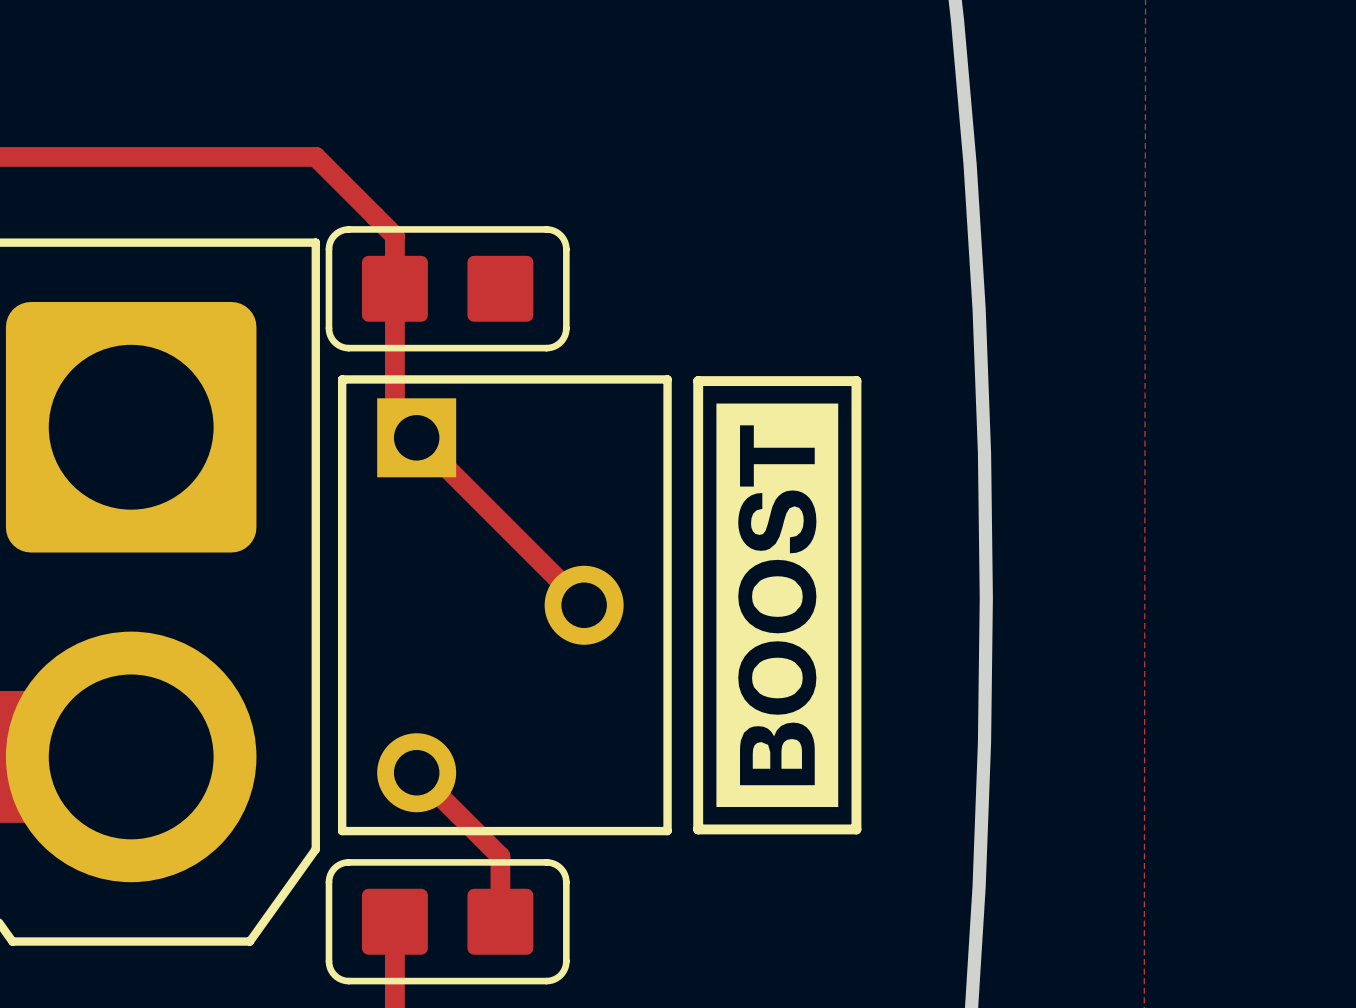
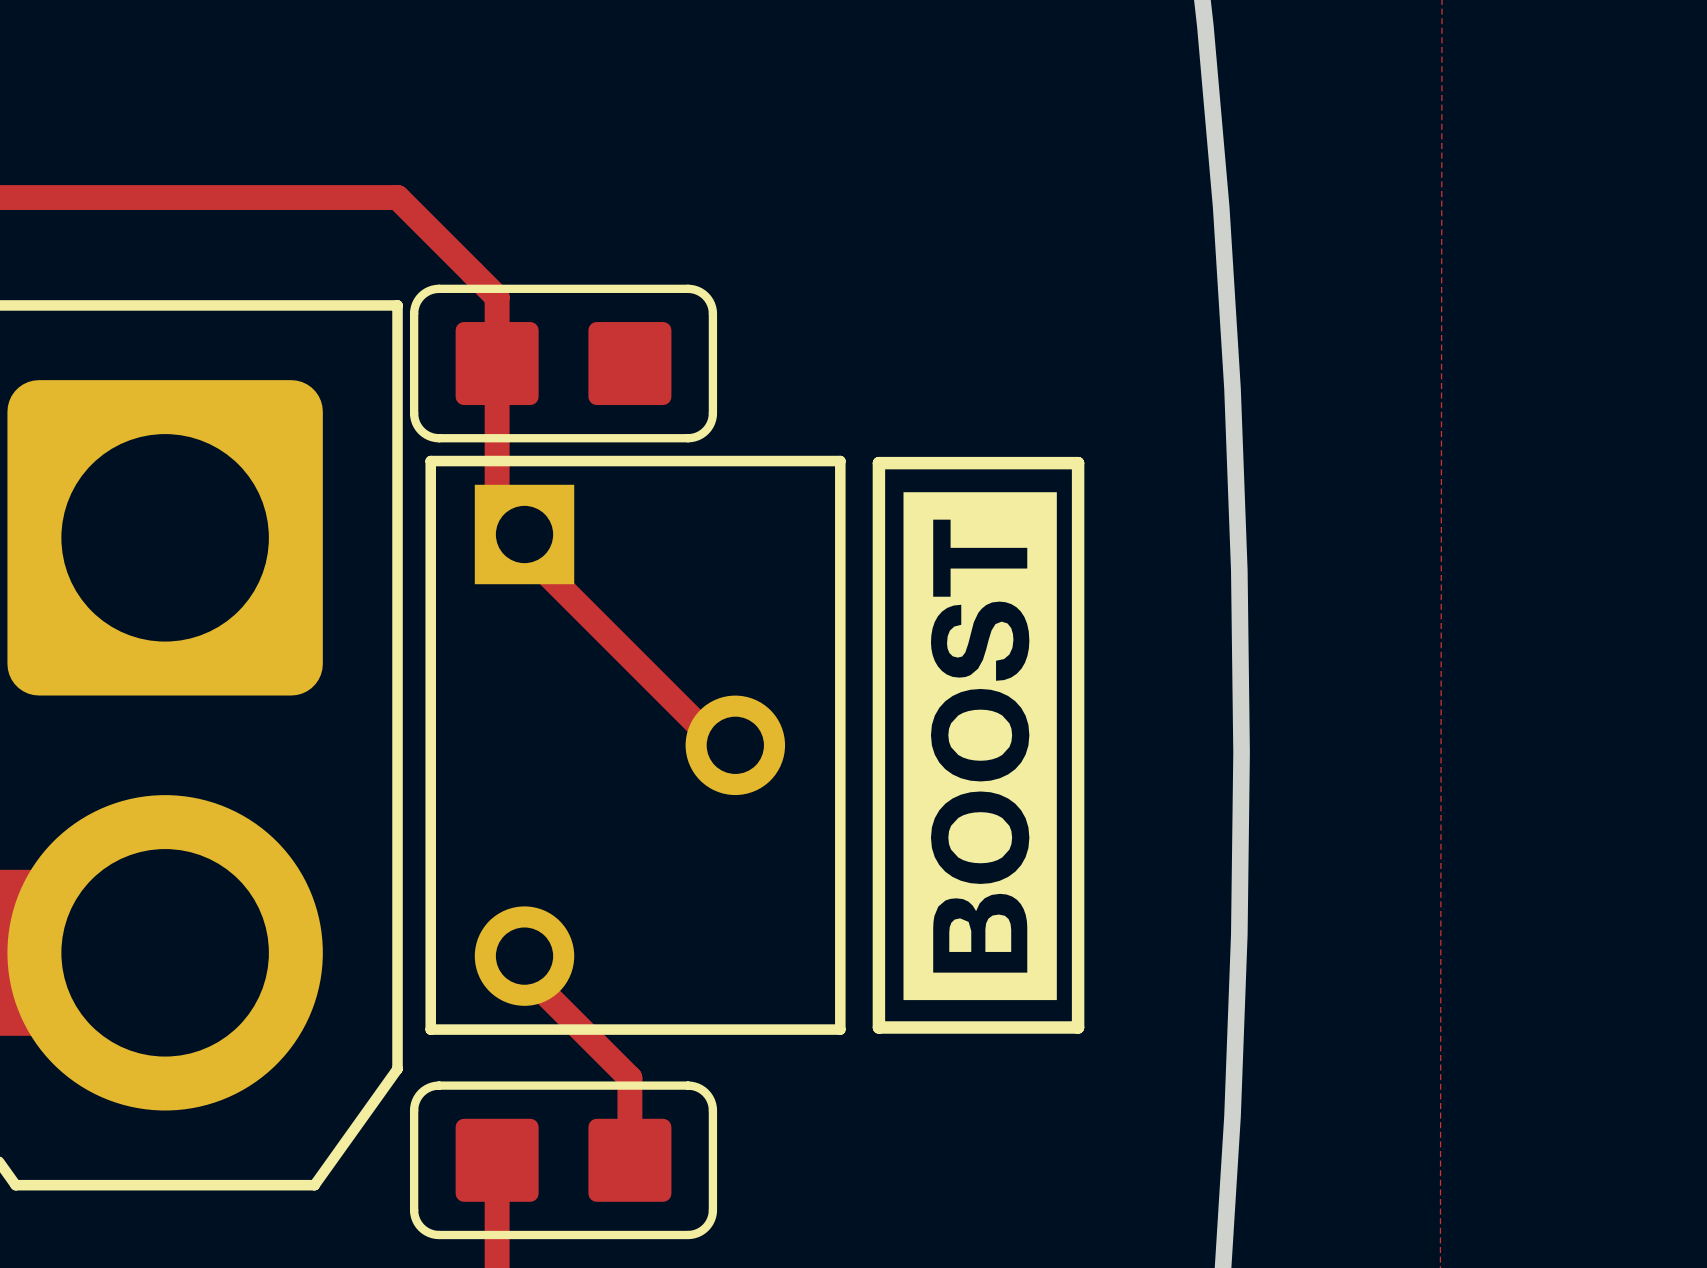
line: (698, 381) (856, 381) -> (878, 479) (878, 463) (1078, 463) (1078, 479)
part position: (504, 605) -> (635, 745)
drawing position: (777, 605) -> (980, 746)
line: (698, 816) (698, 829) (856, 829) (856, 816) -> (878, 1027) (1078, 1027)

